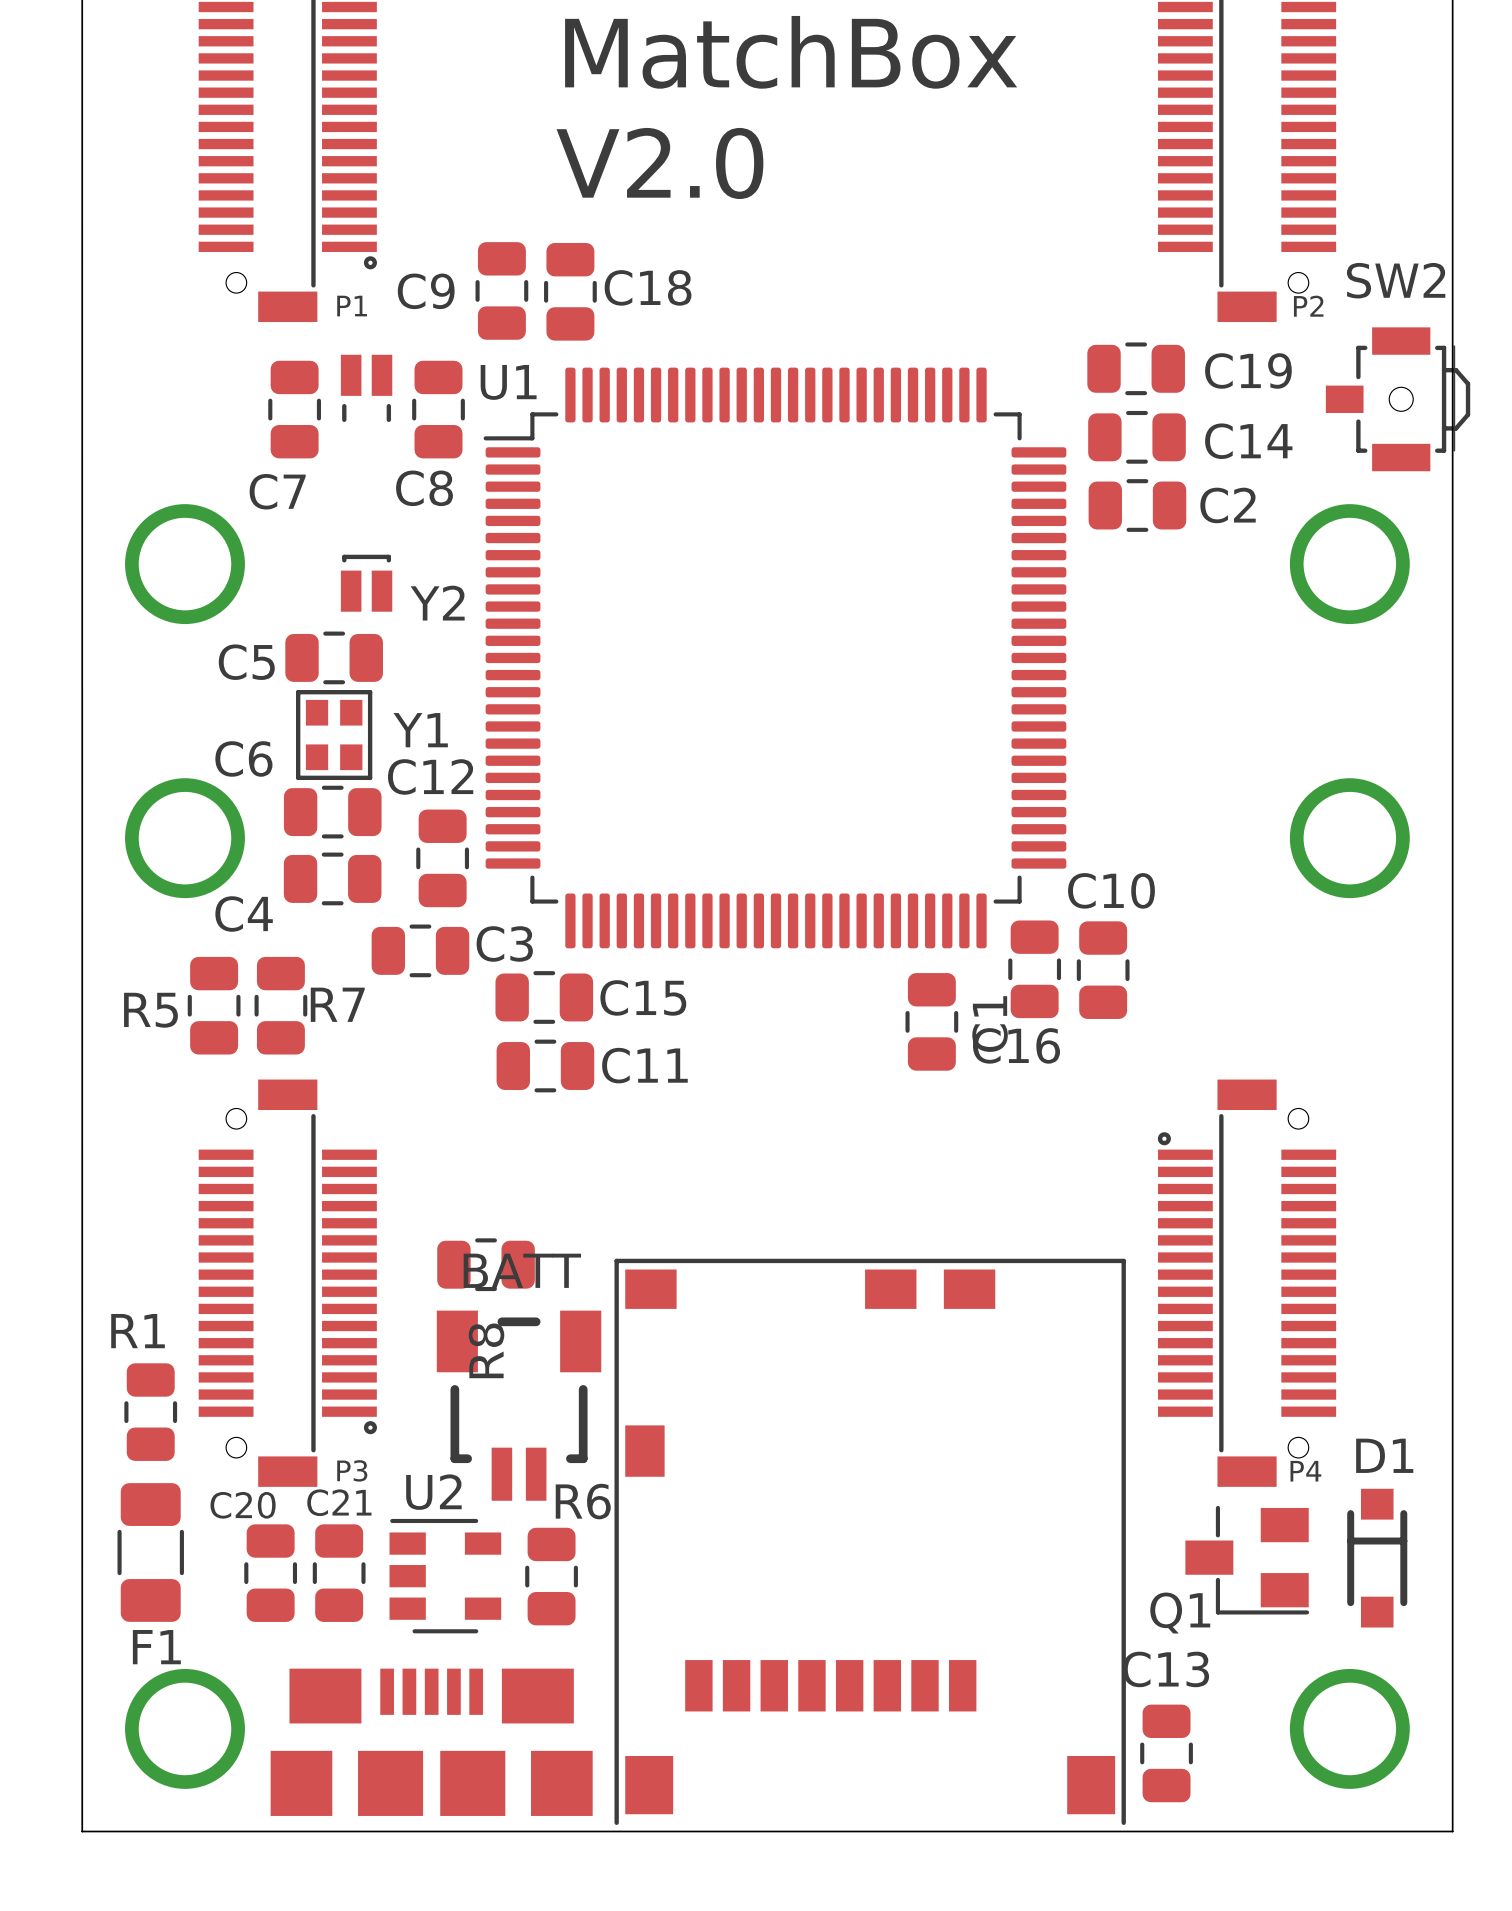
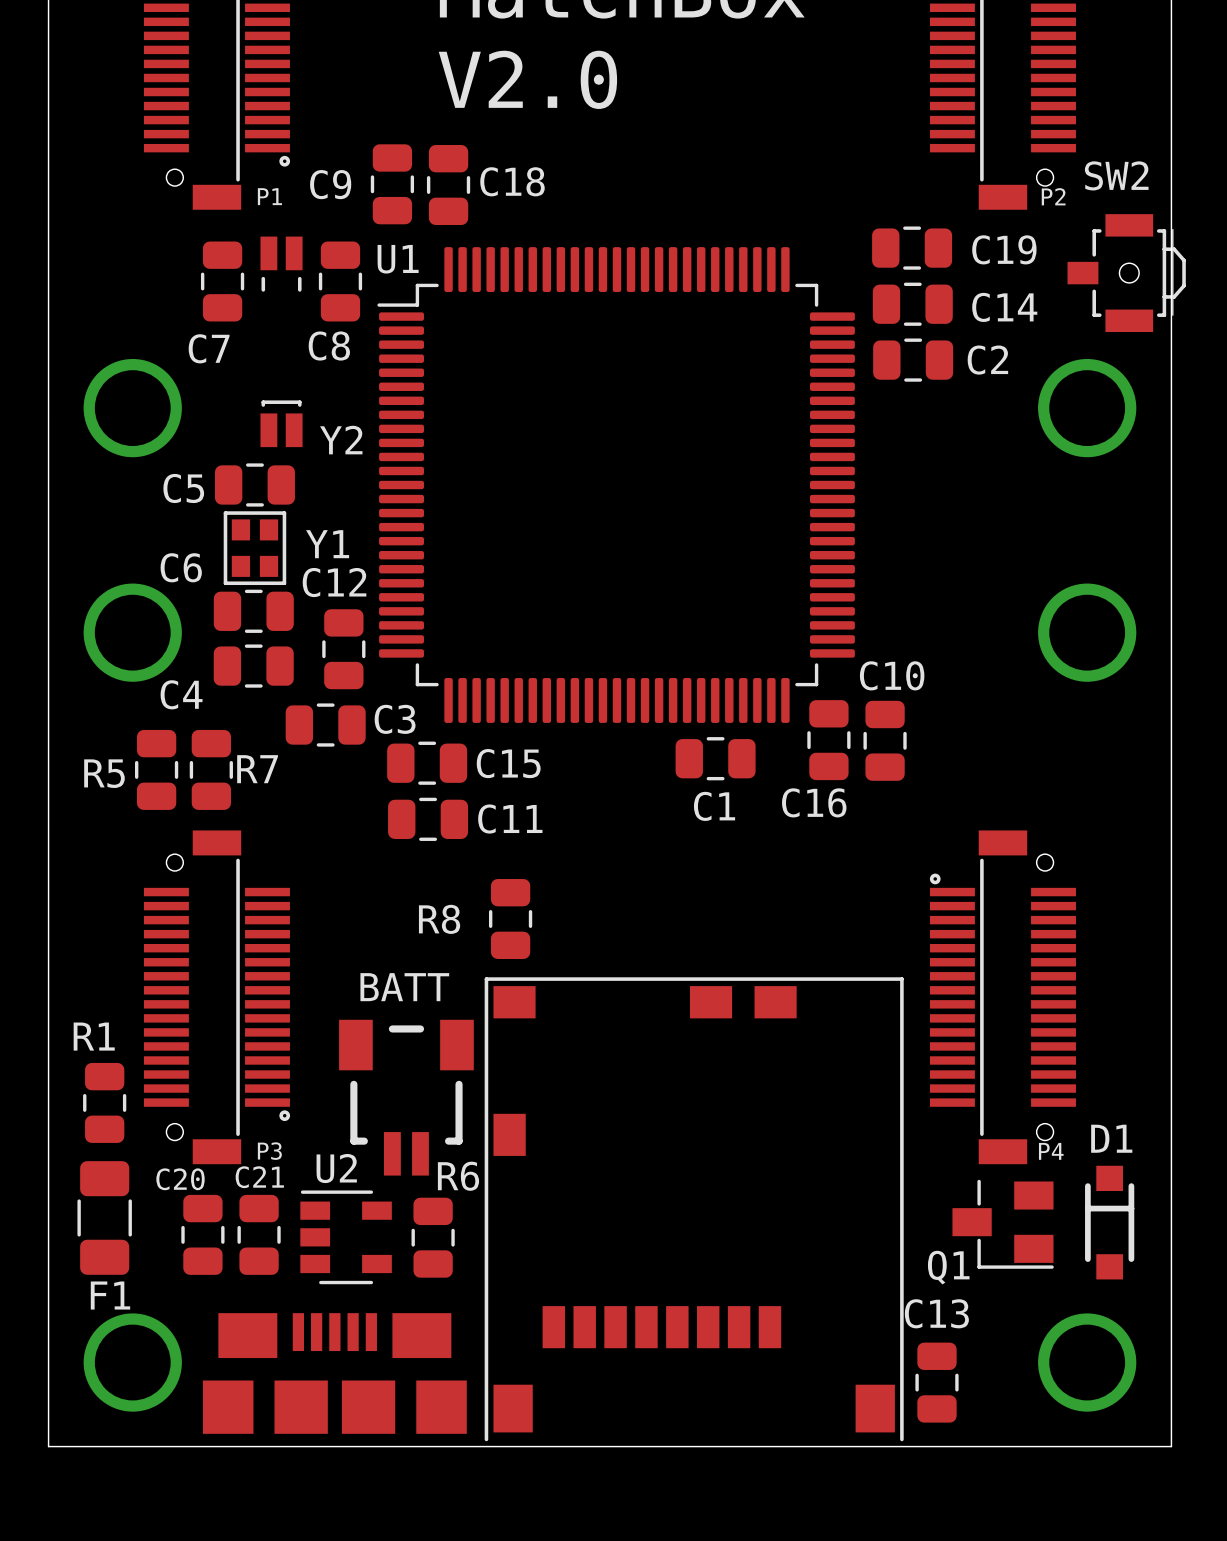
C1 rotation: 0° (931, 1021) -> 90° clockwise (715, 758)
R8 rotation: 0° (486, 1264) -> 90° clockwise (510, 919)
R8 position: (486, 1264) -> (510, 919)

